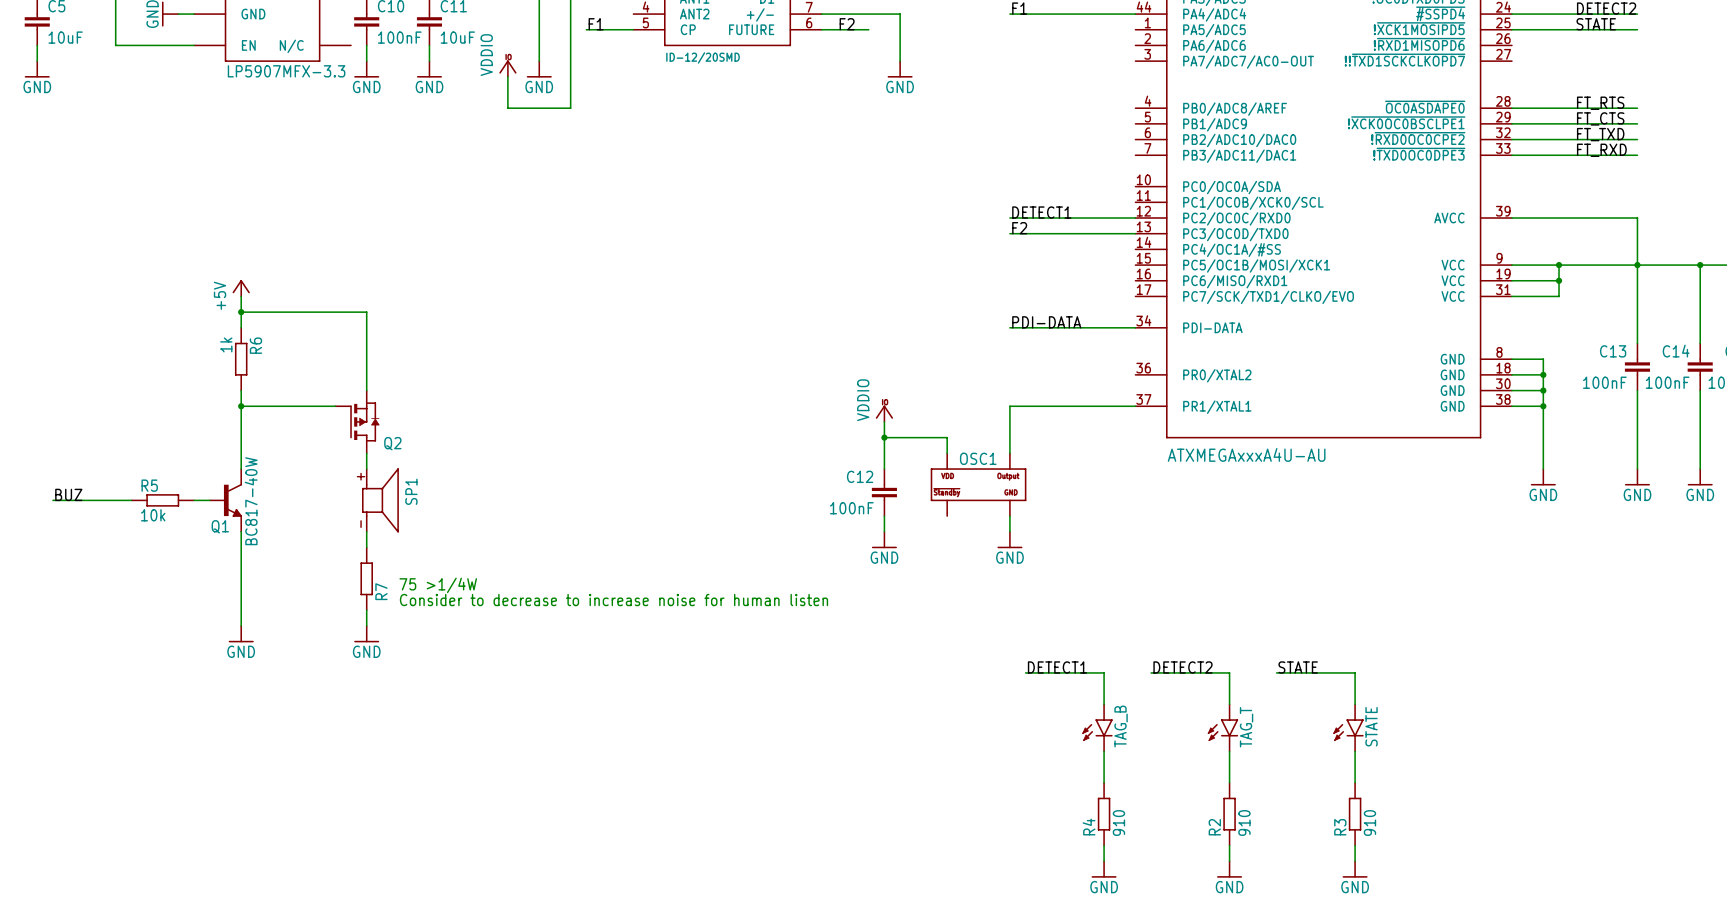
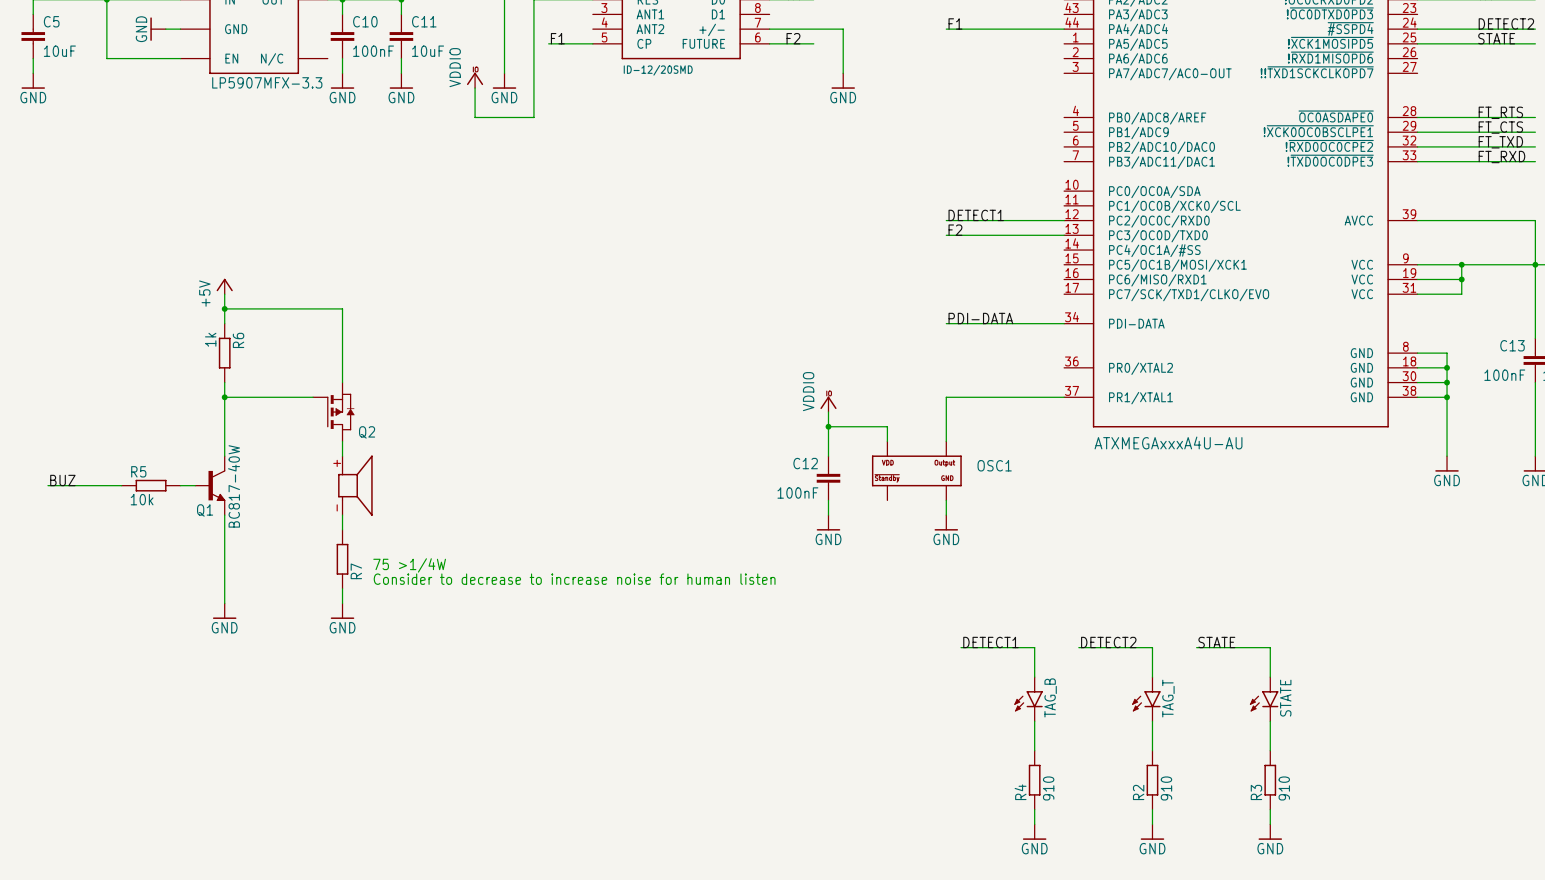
OSC1 name position: OSC1 (978, 458) -> OSC1 (994, 465)
SP1 name: SP1 (411, 491) -> none

